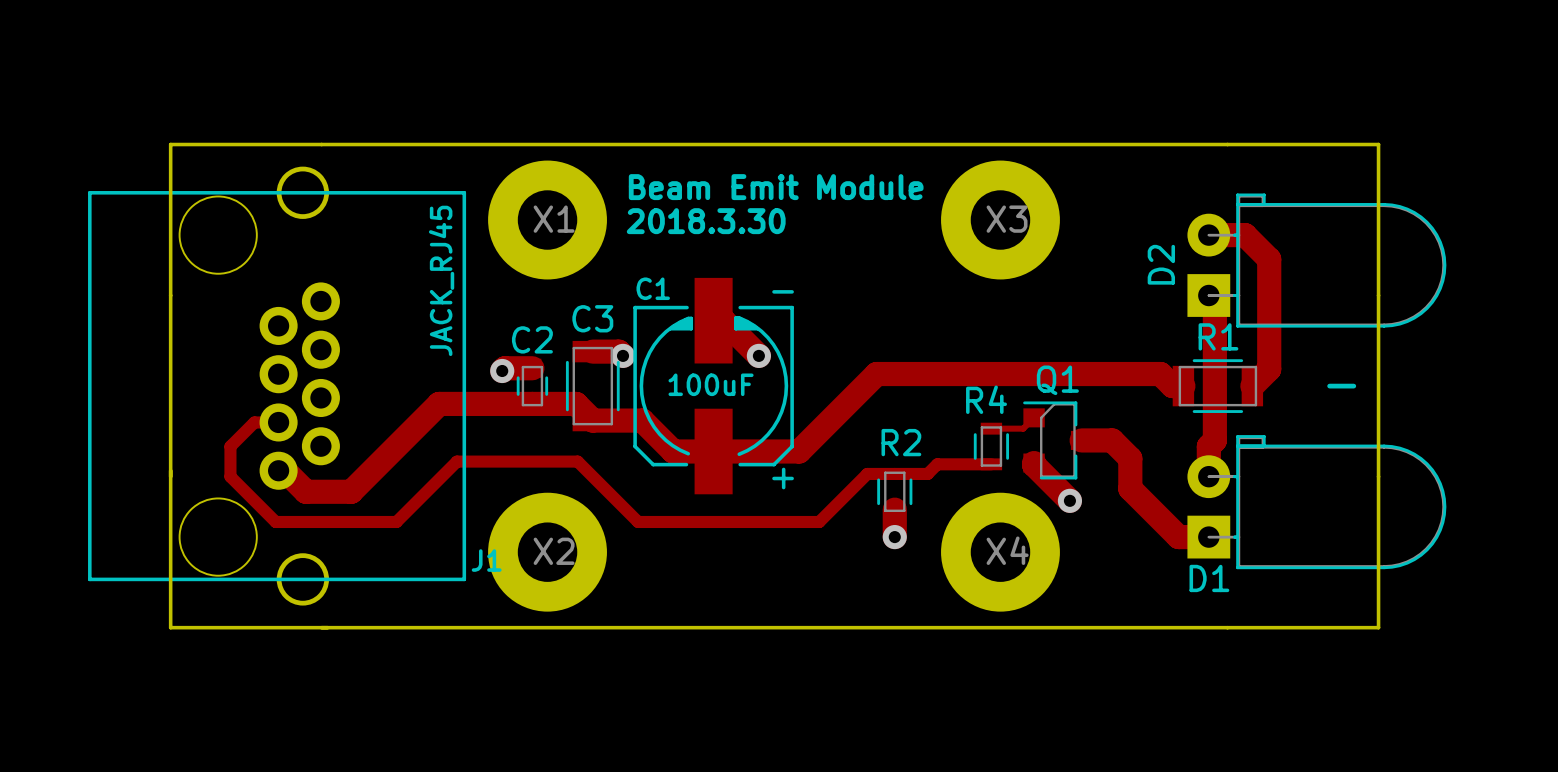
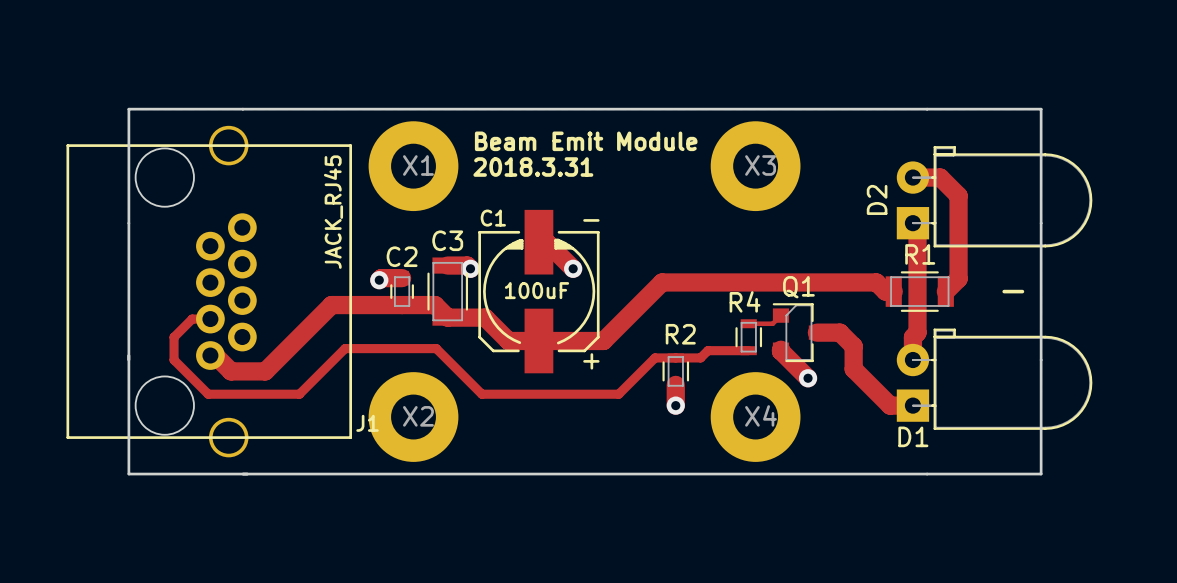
text: 2018.3.30 (706, 221) -> 2018.3.31 (533, 167)

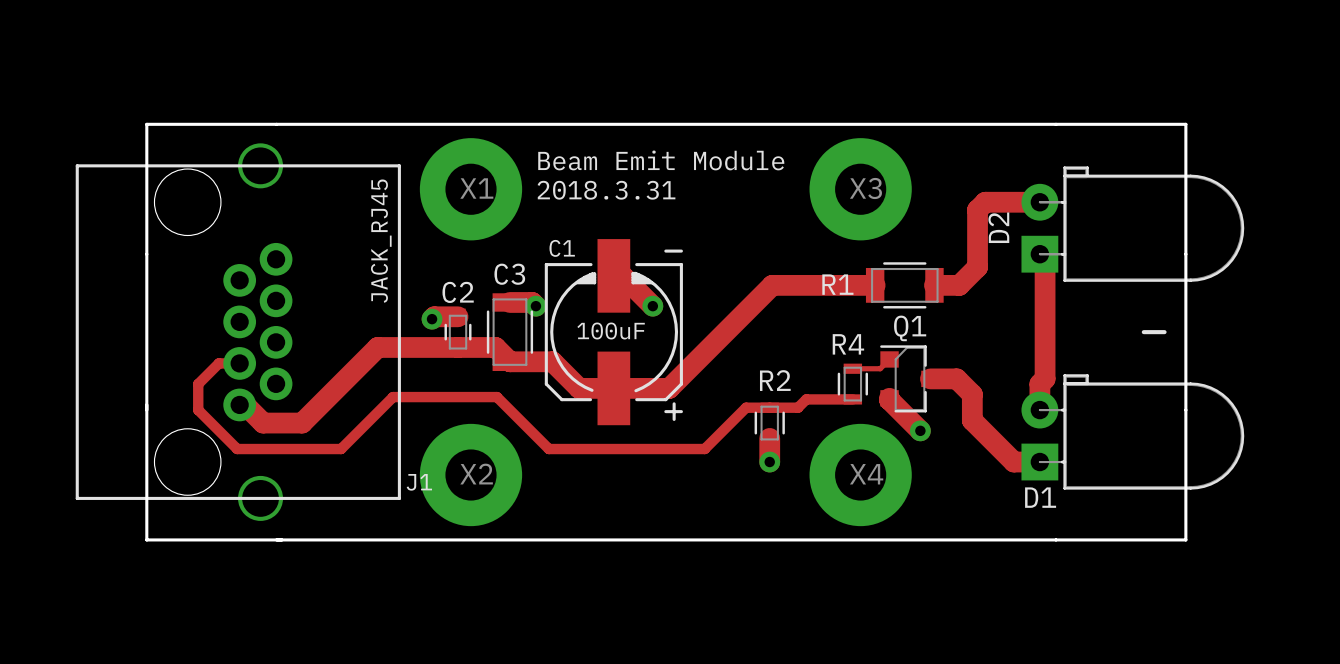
top track: (912, 177) (940, 177) (958, 195) (958, 278) (945, 291) -> (1039, 202) (985, 202) (977, 210) (977, 267) (959, 285) (934, 285)
R1 name position: R1 (920, 254) -> R1 (837, 284)
top track: (893, 291) (885, 291) (876, 282) (662, 282) (603, 340) (587, 340) -> (875, 285) (772, 285) (669, 388)
R1 position: (919, 291) -> (904, 285)

